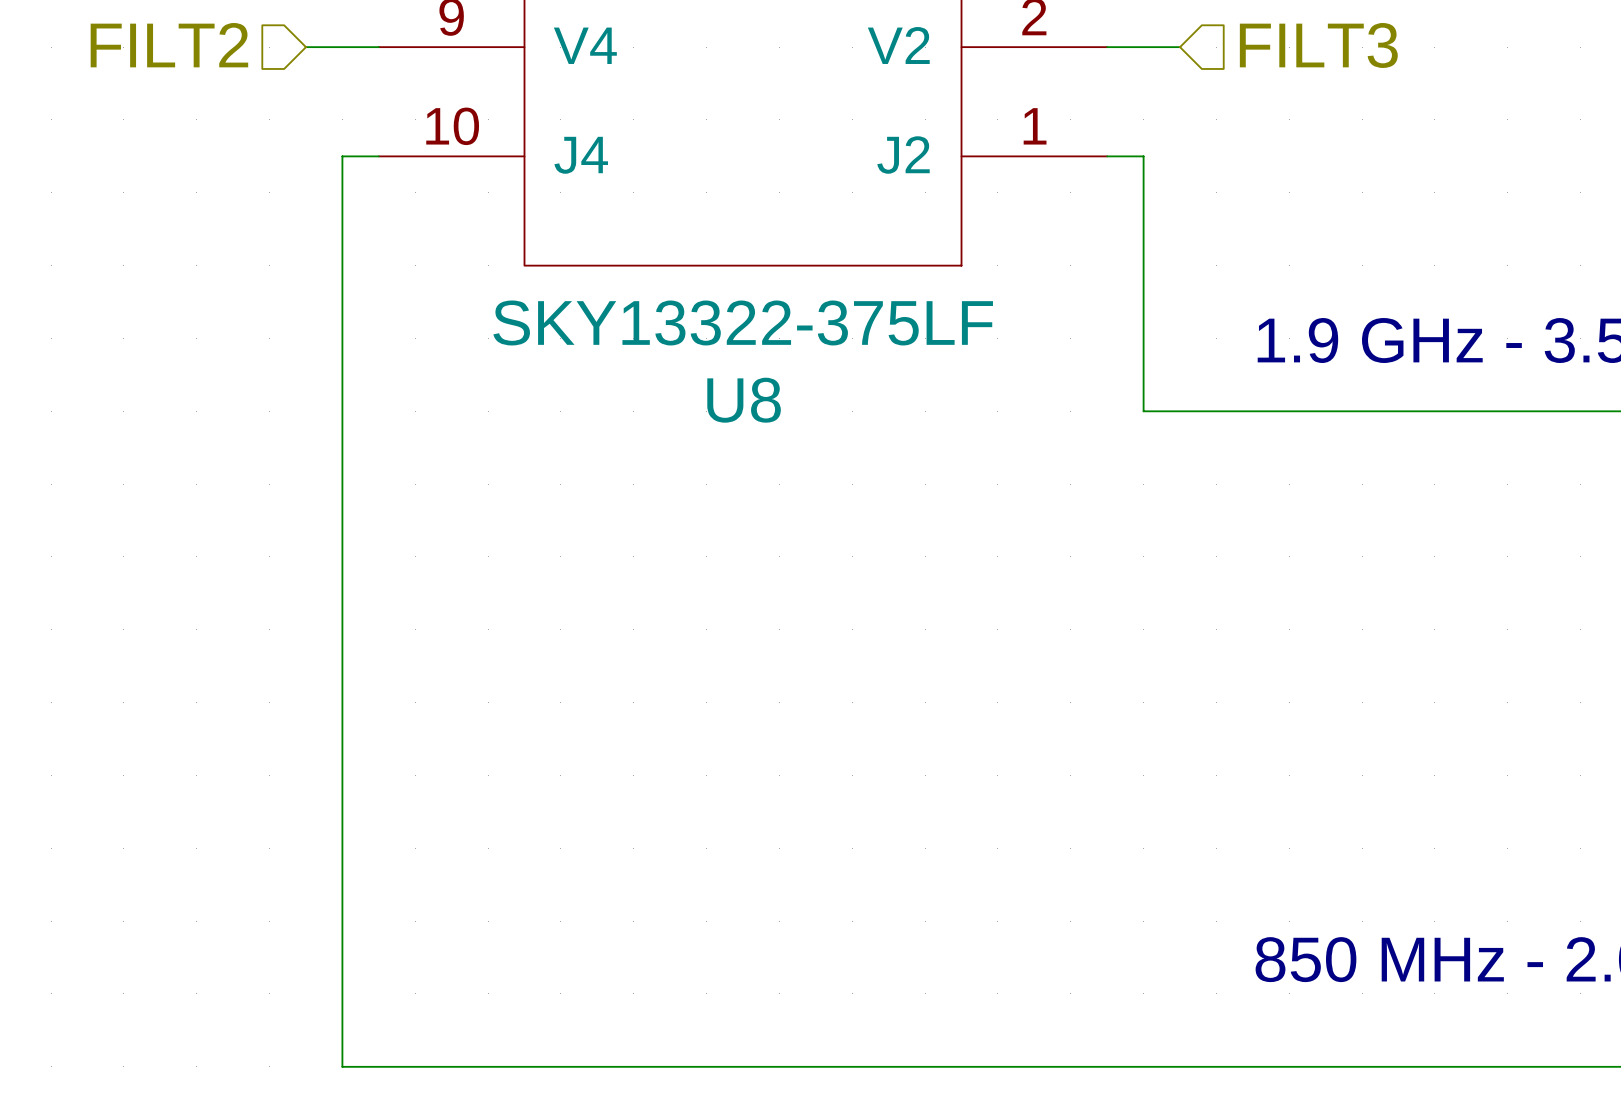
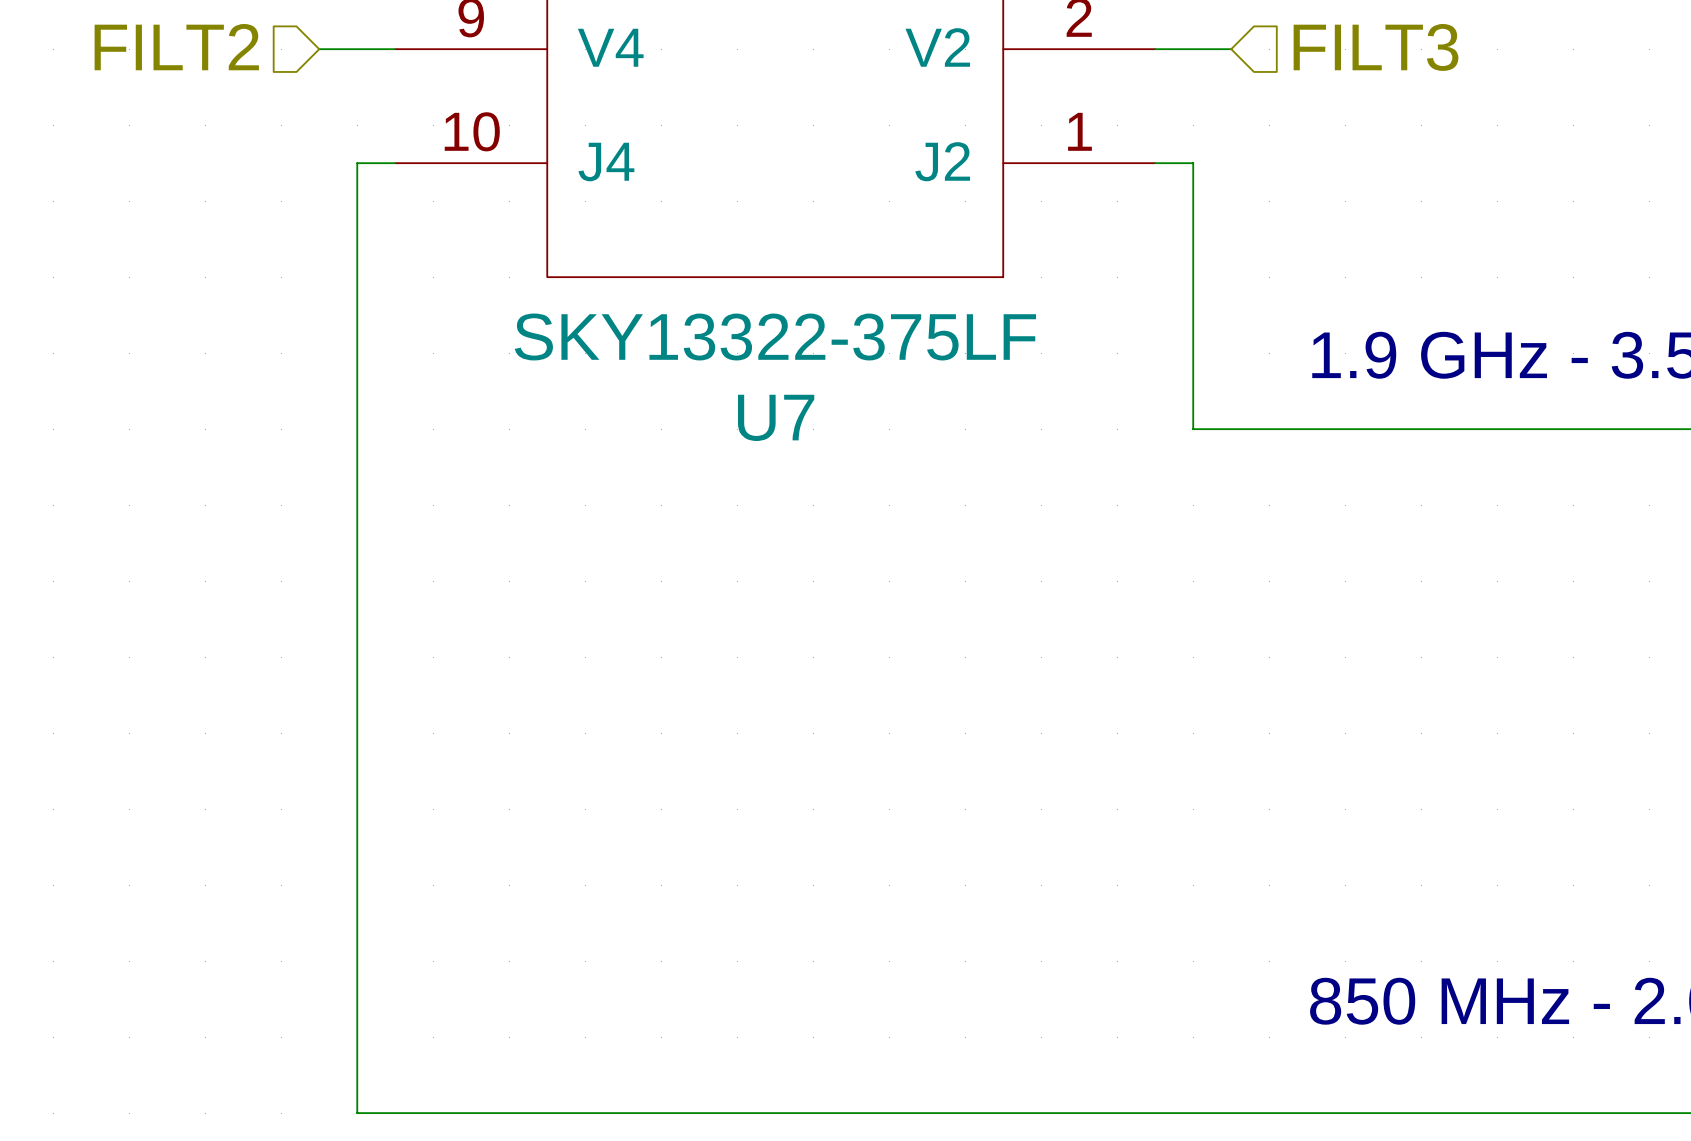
U8 name: U8 (744, 400) -> U7 (776, 417)

